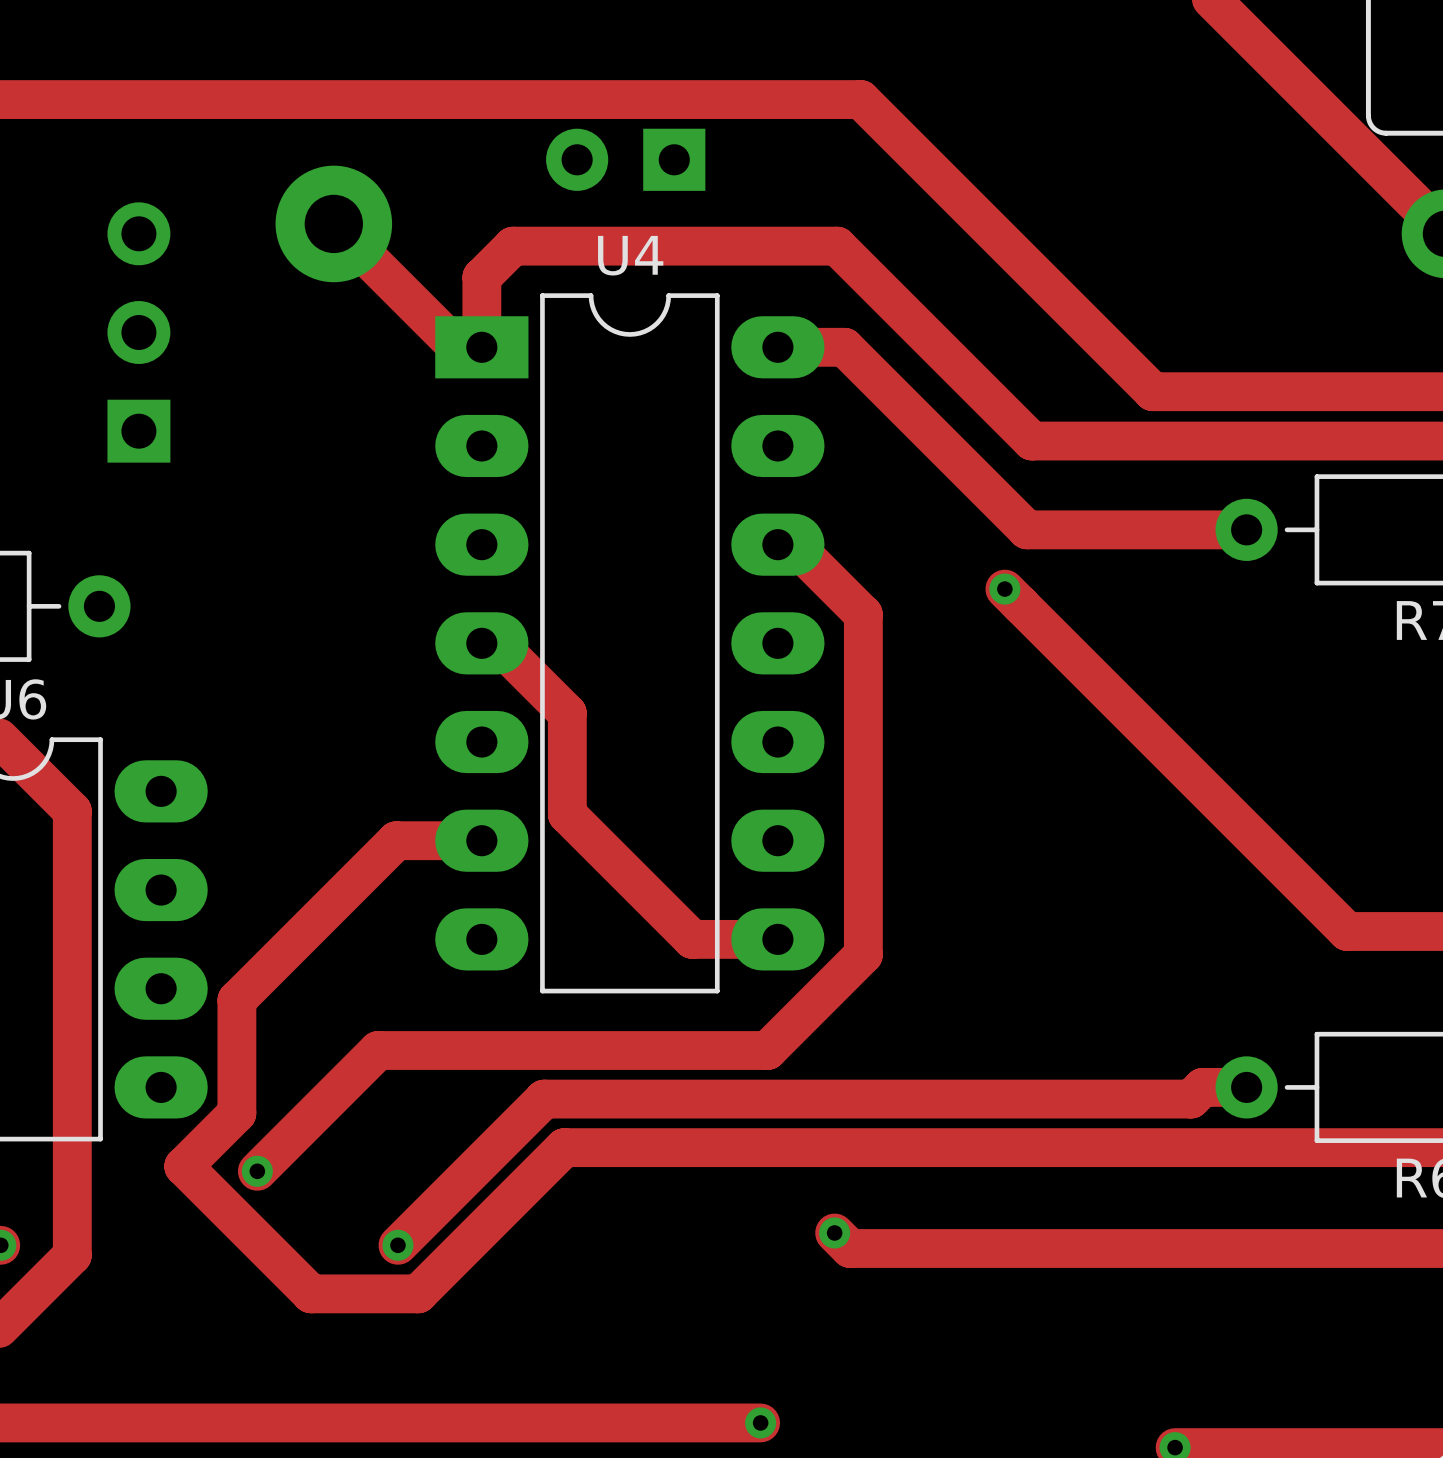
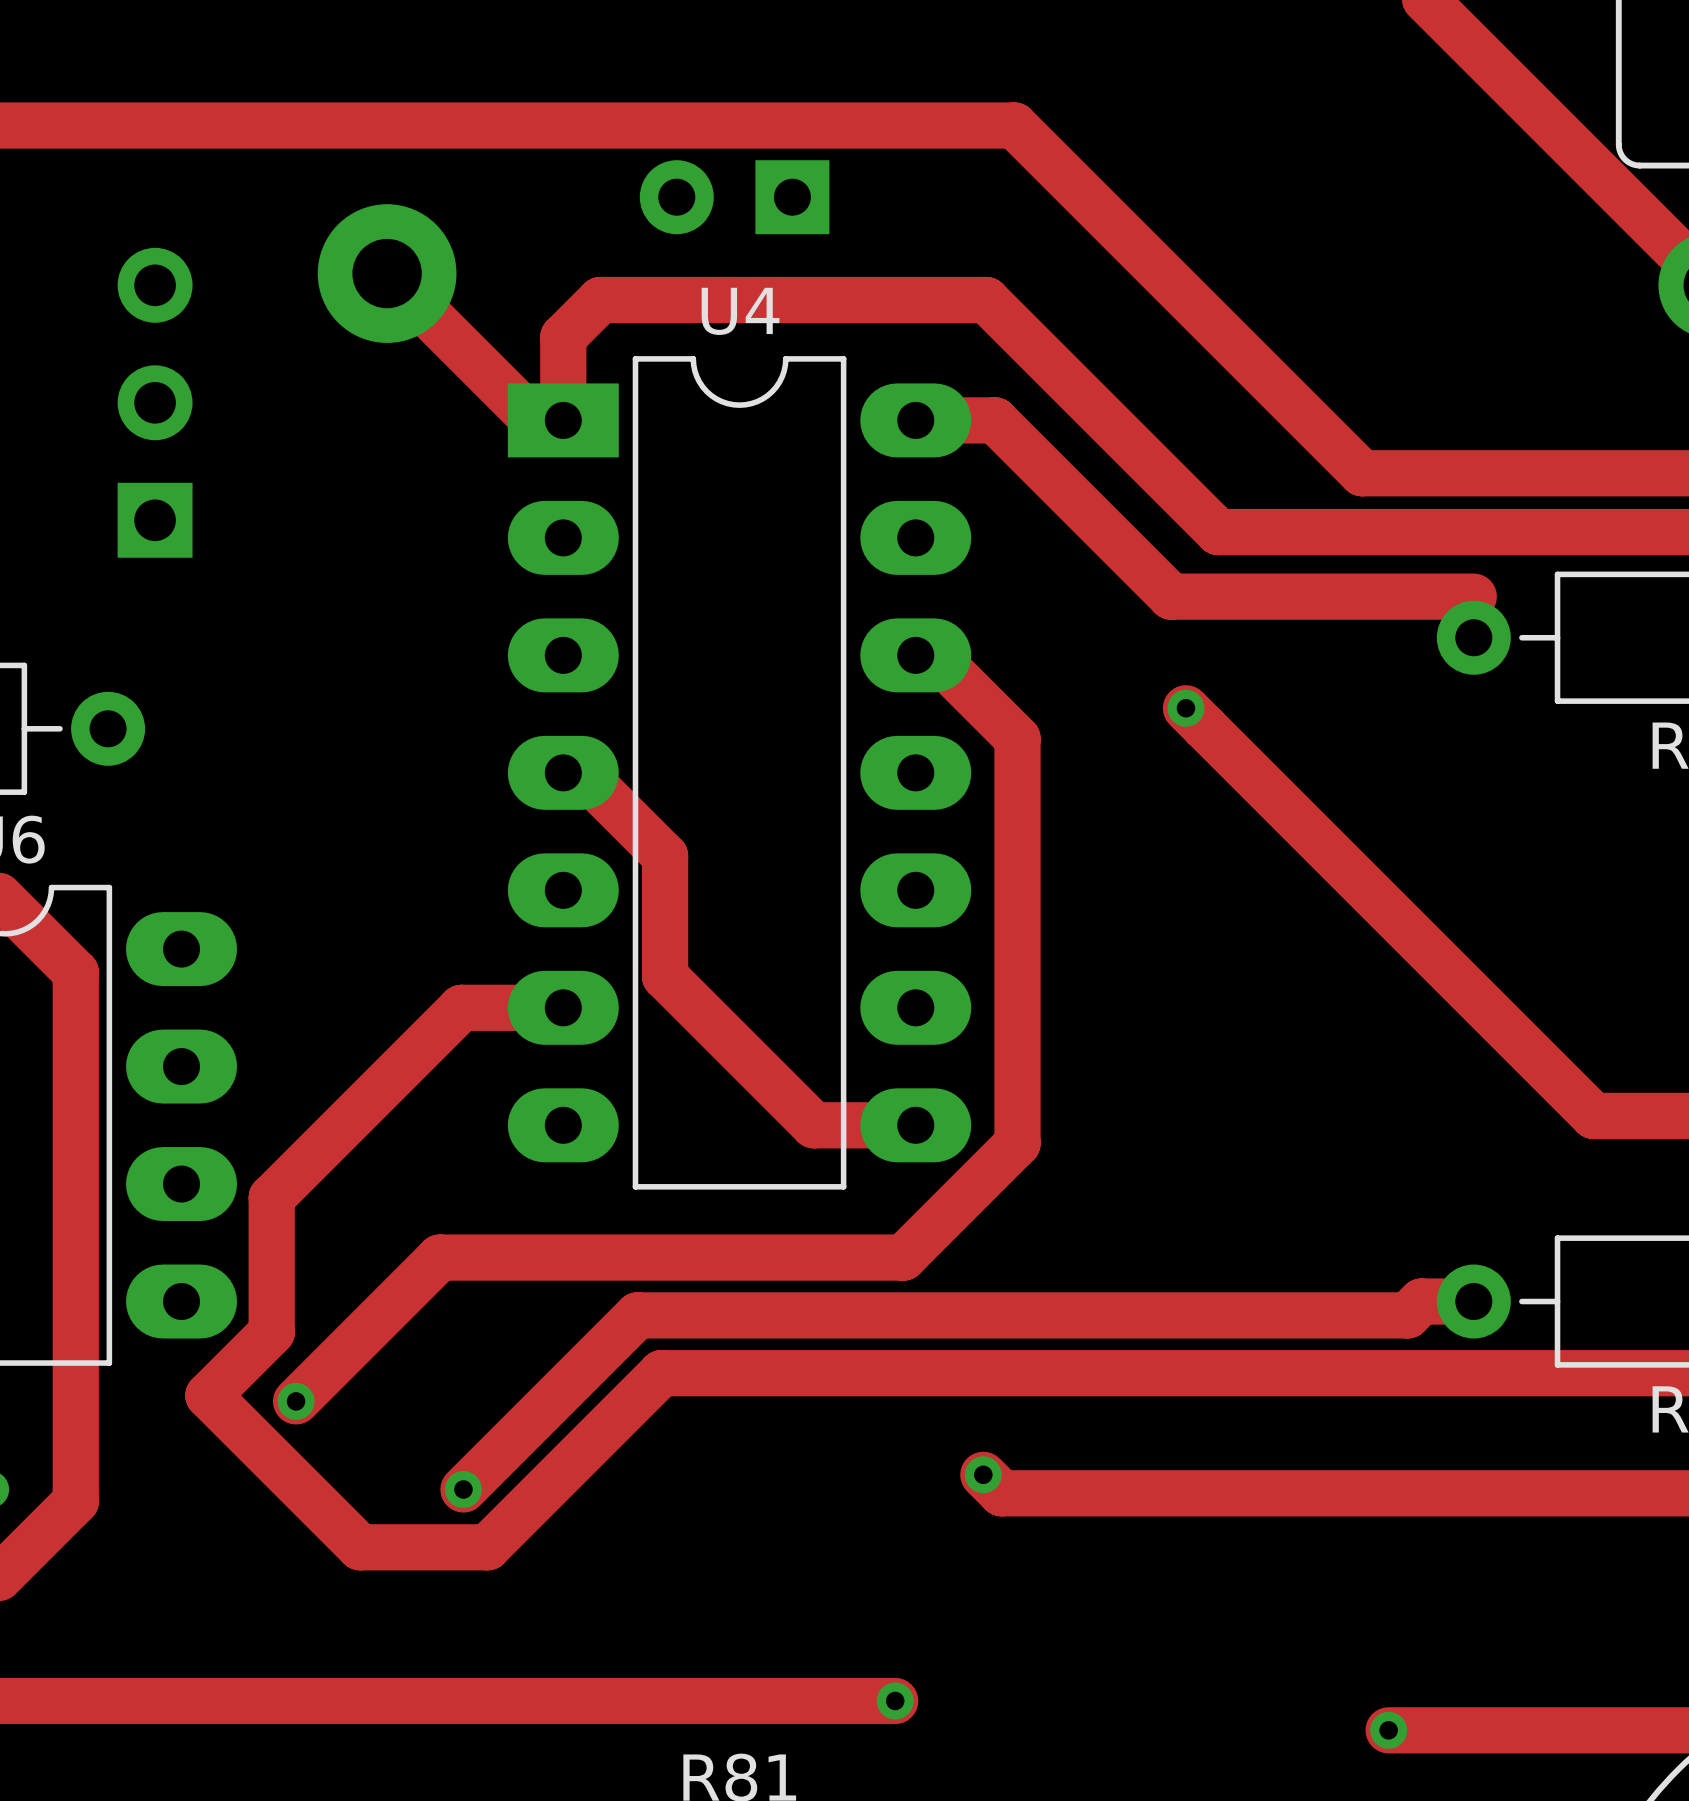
track: (992, 495) (1027, 529) (1246, 529) -> (1171, 596) (1473, 596)

